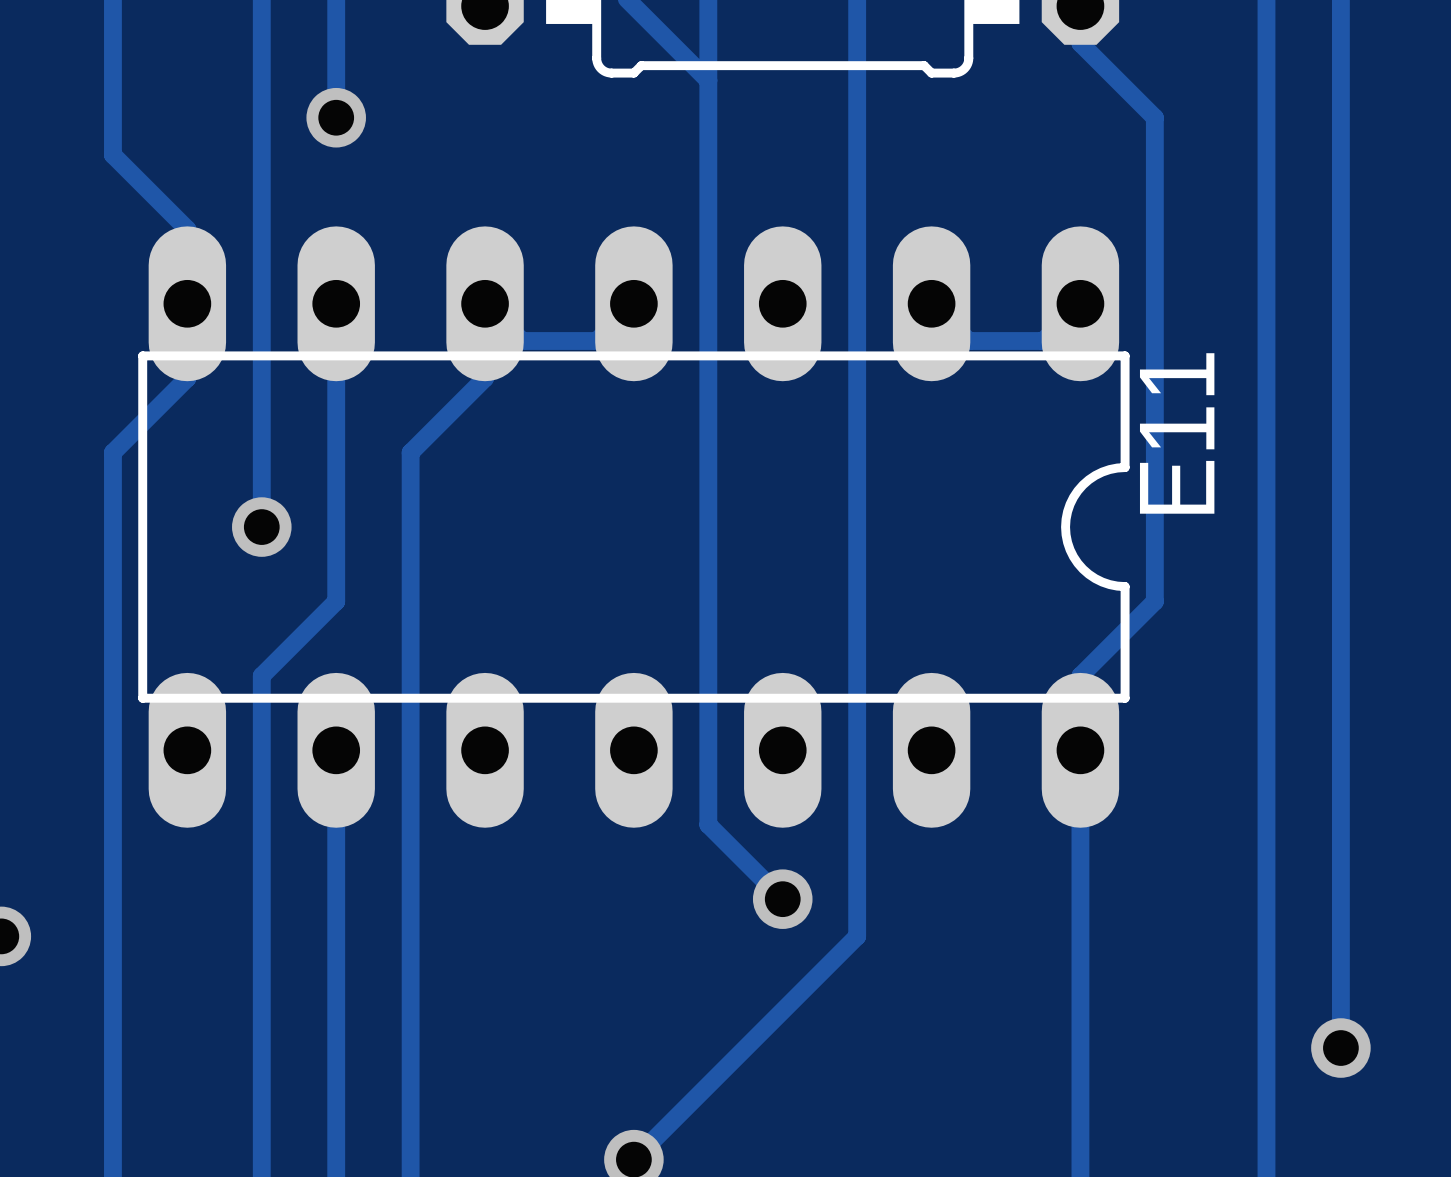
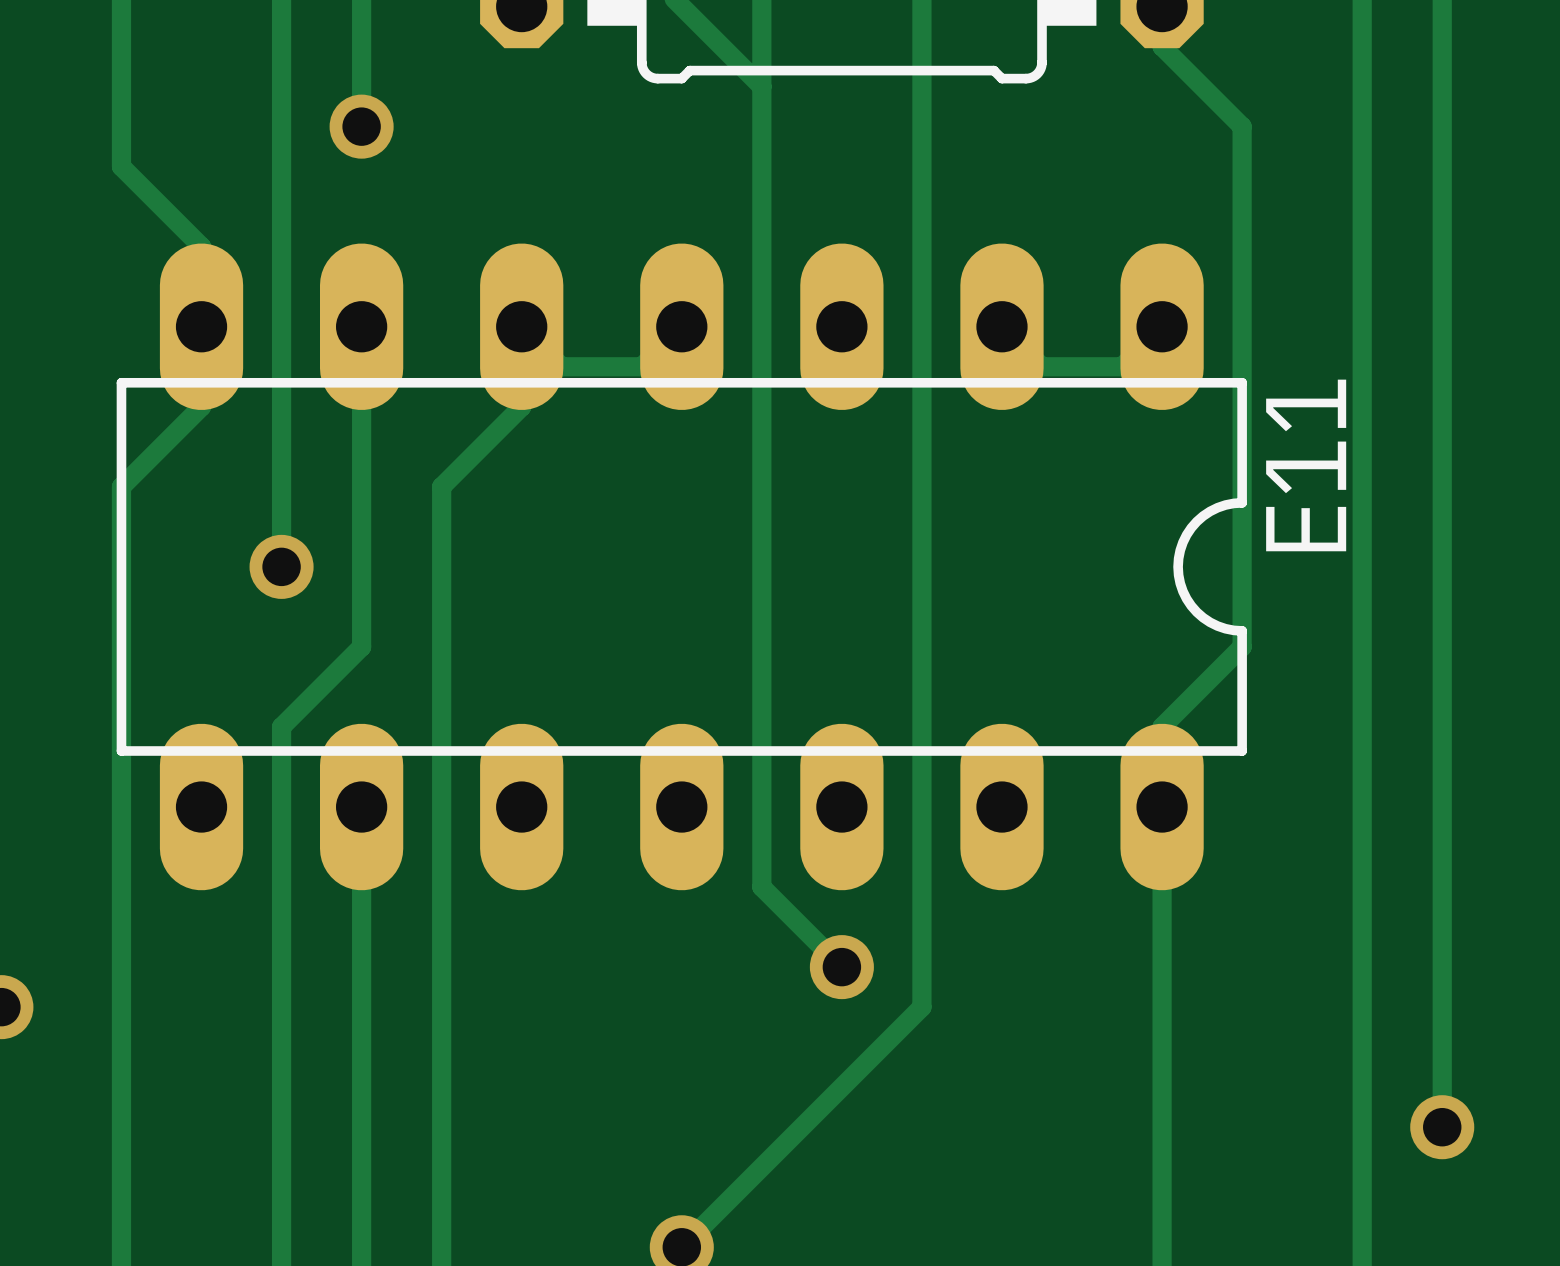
E11 footprint: [138, 226, 1130, 828] -> [116, 243, 1247, 891]
E11 name position: E11 (1177, 433) -> E11 (1306, 465)

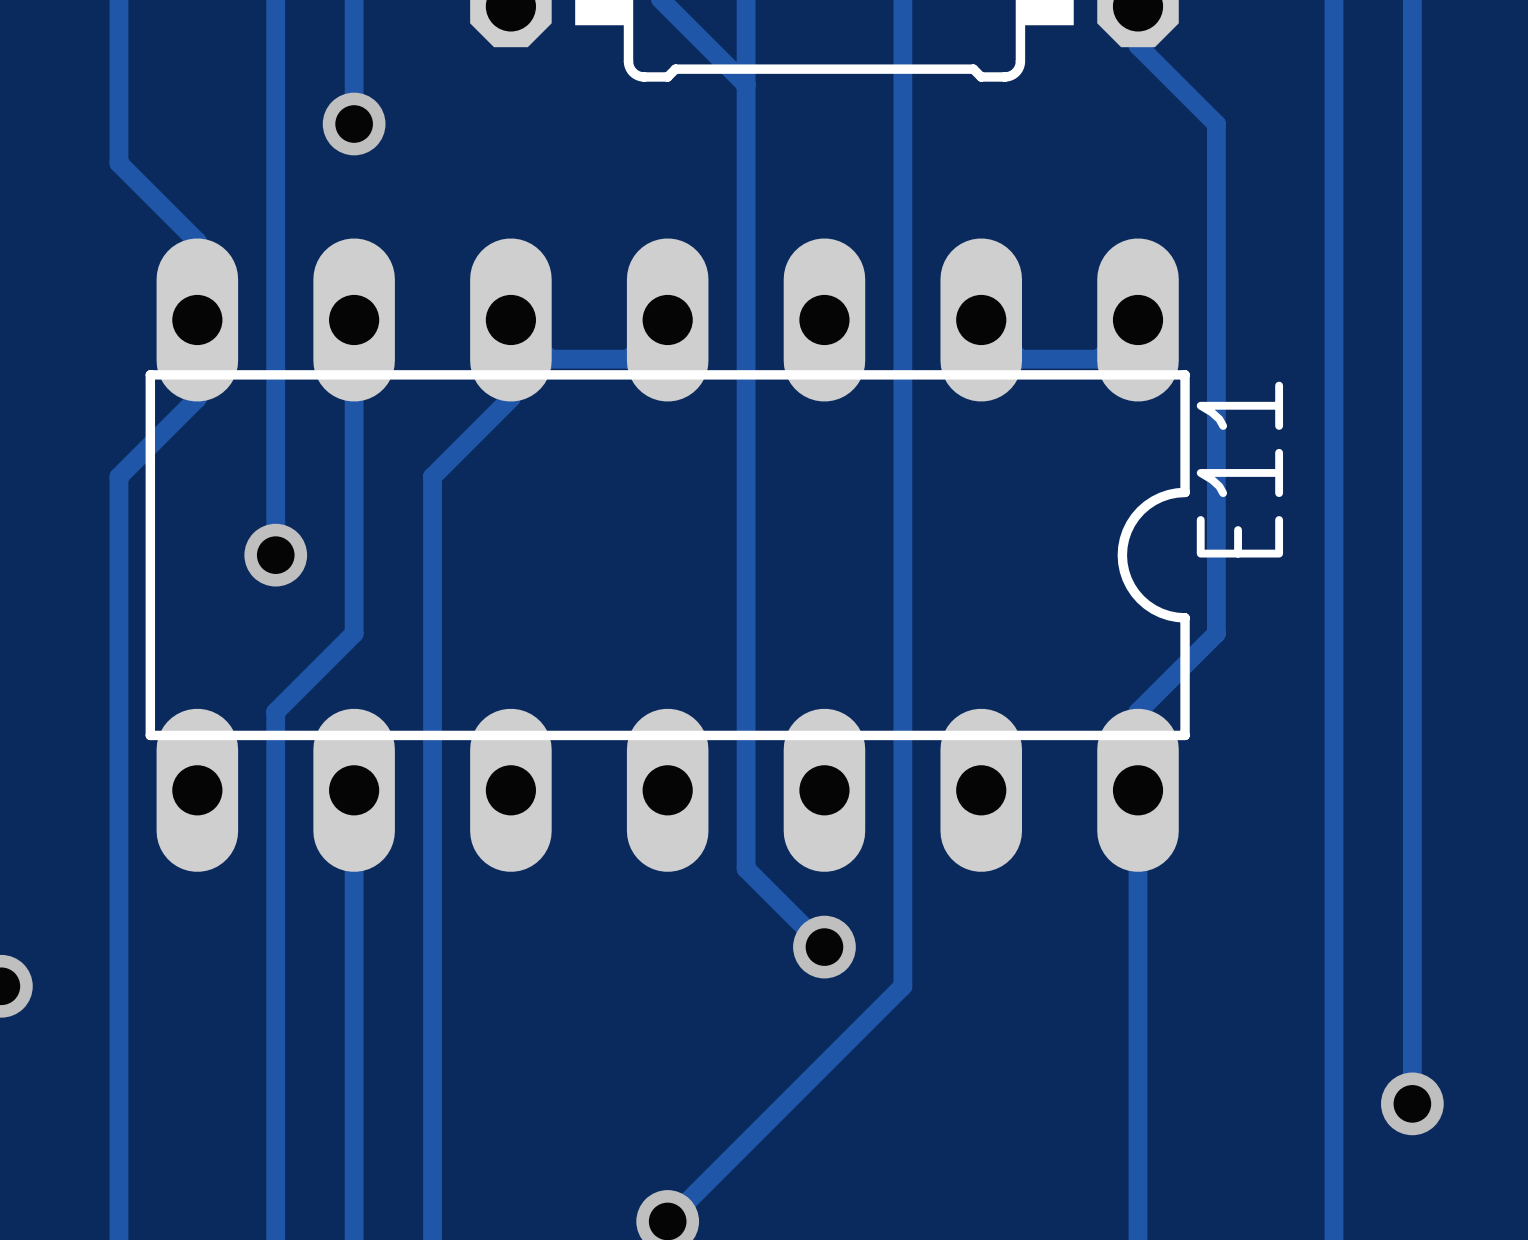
E11 footprint: [116, 243, 1247, 891] -> [145, 238, 1190, 872]
E11 name position: E11 (1306, 465) -> E11 (1239, 469)

